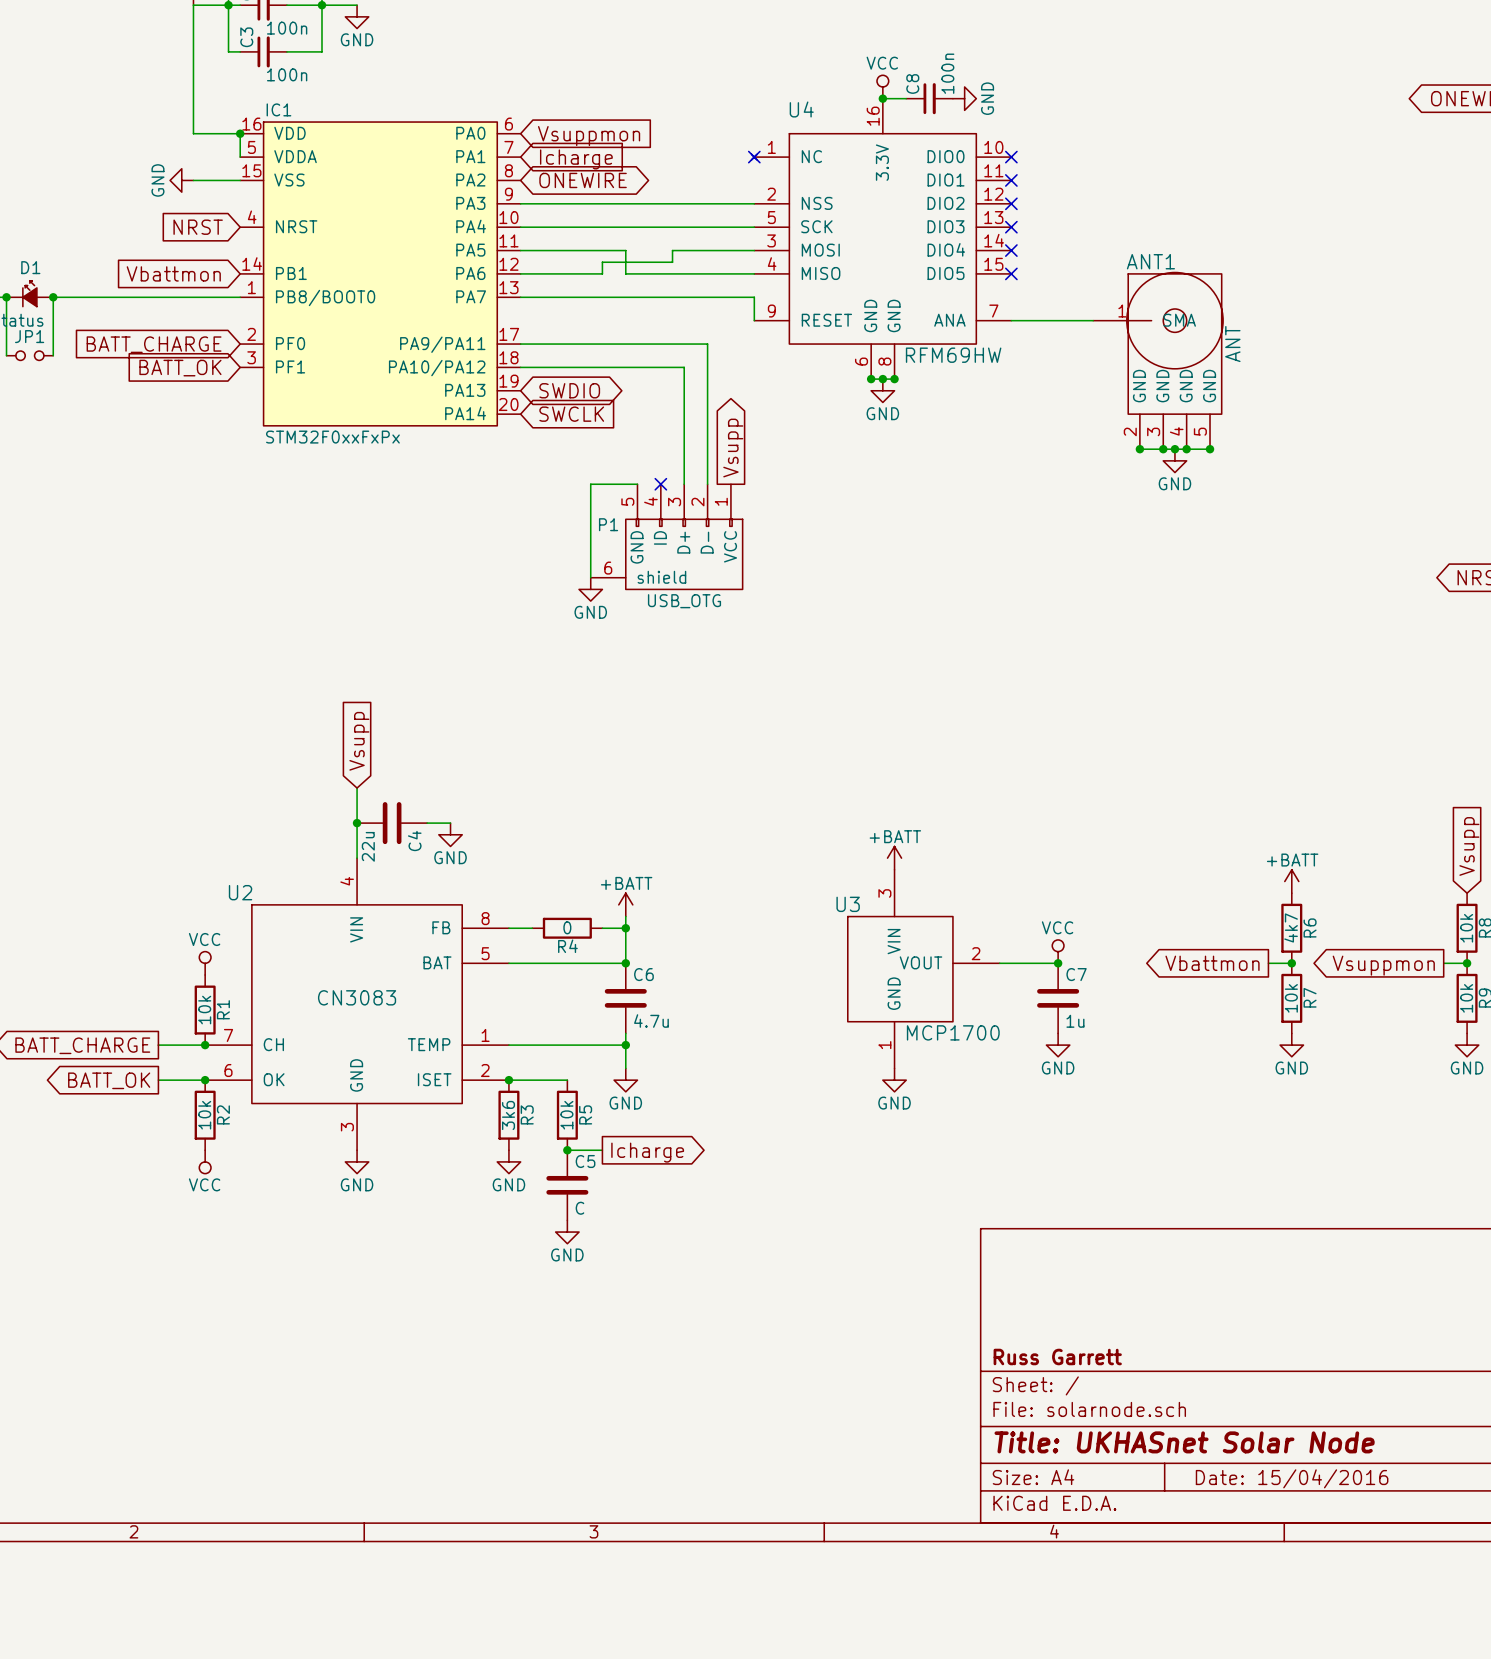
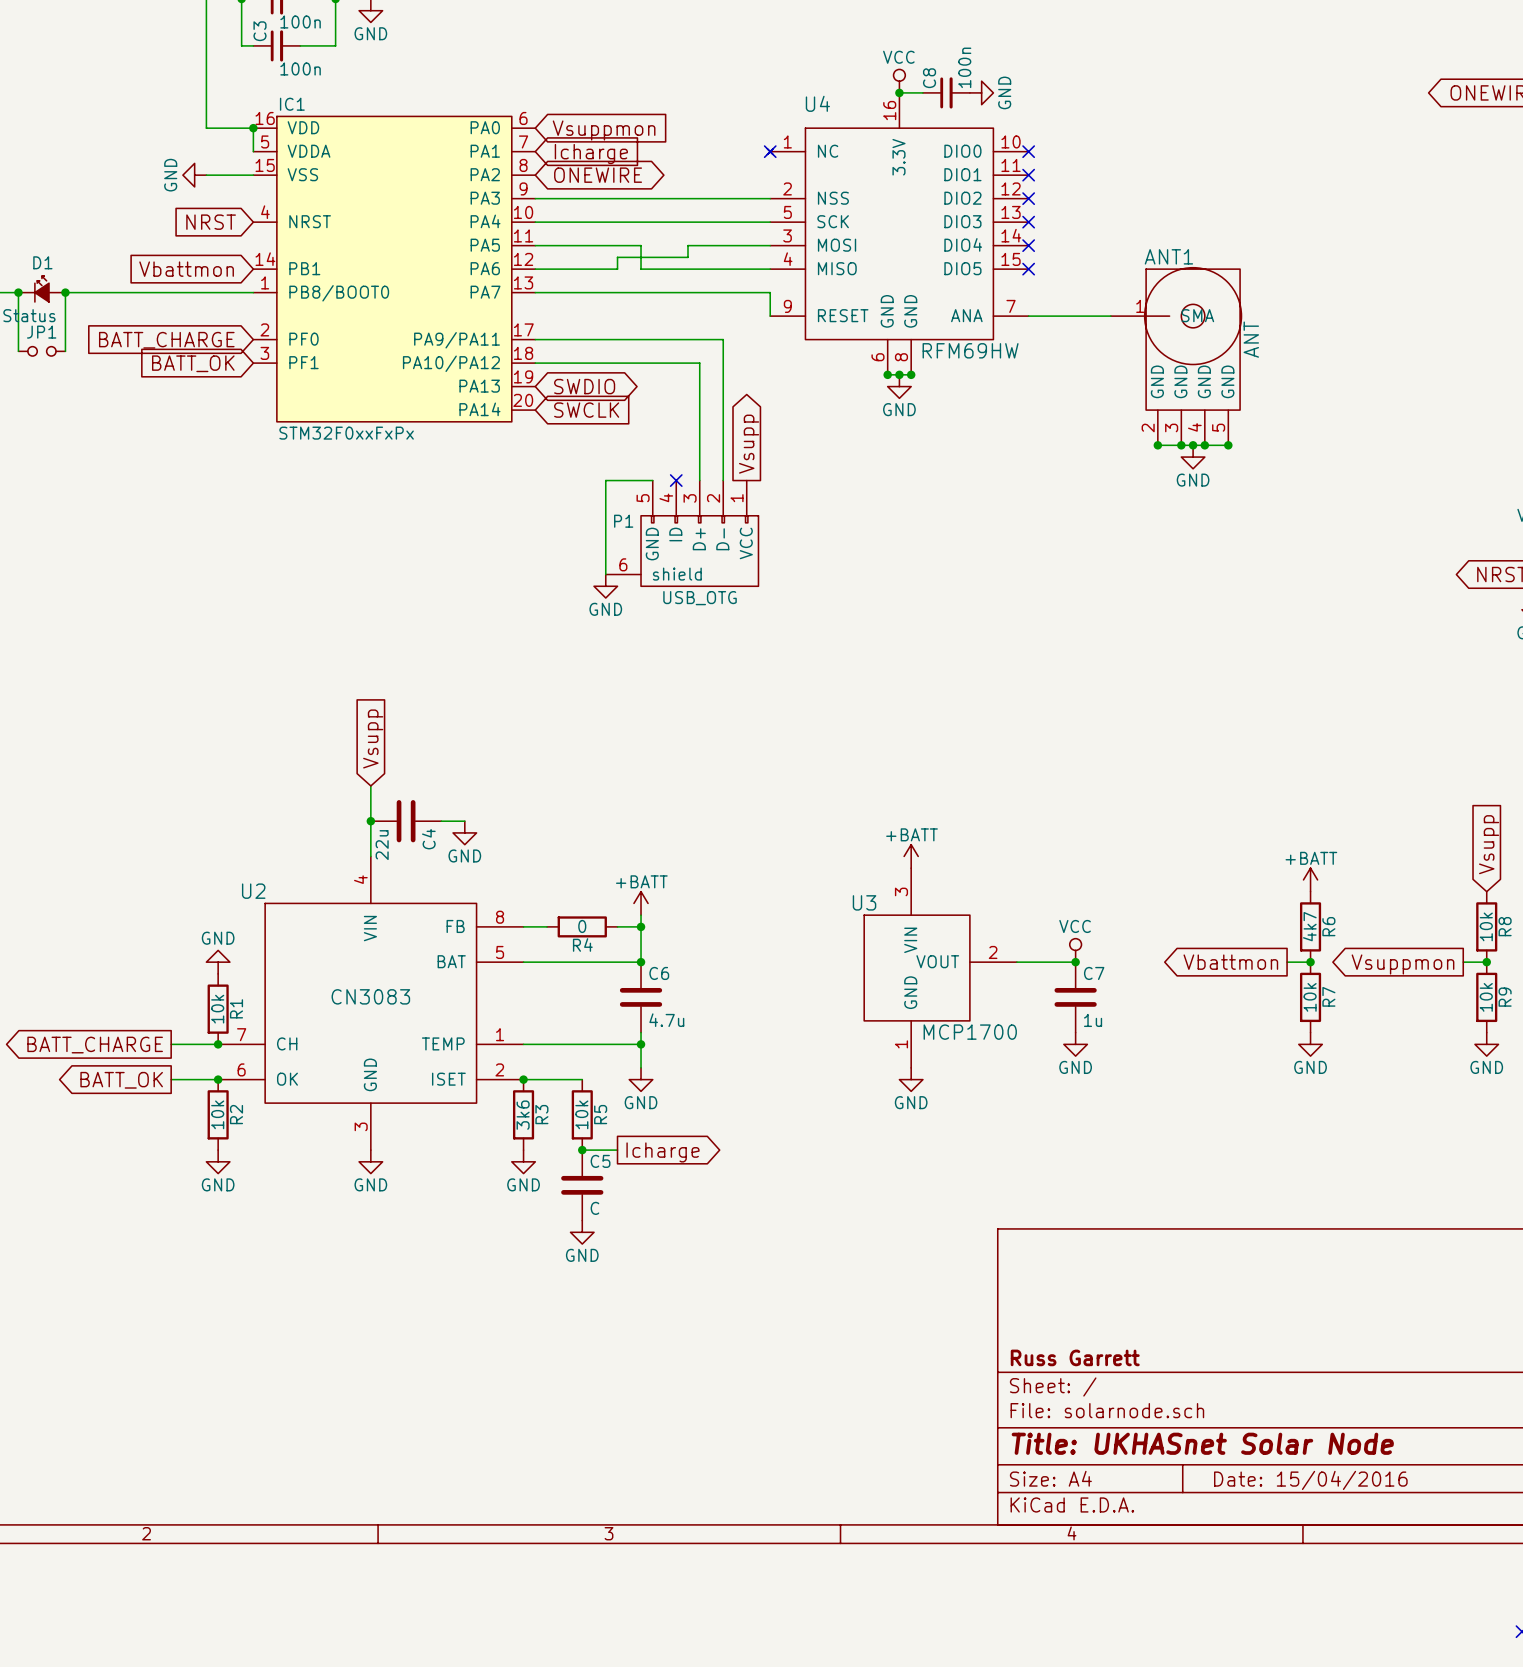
power symbol: VCC (205, 963) -> GND (218, 962)
power symbol: VCC (205, 1161) -> GND (218, 1161)

